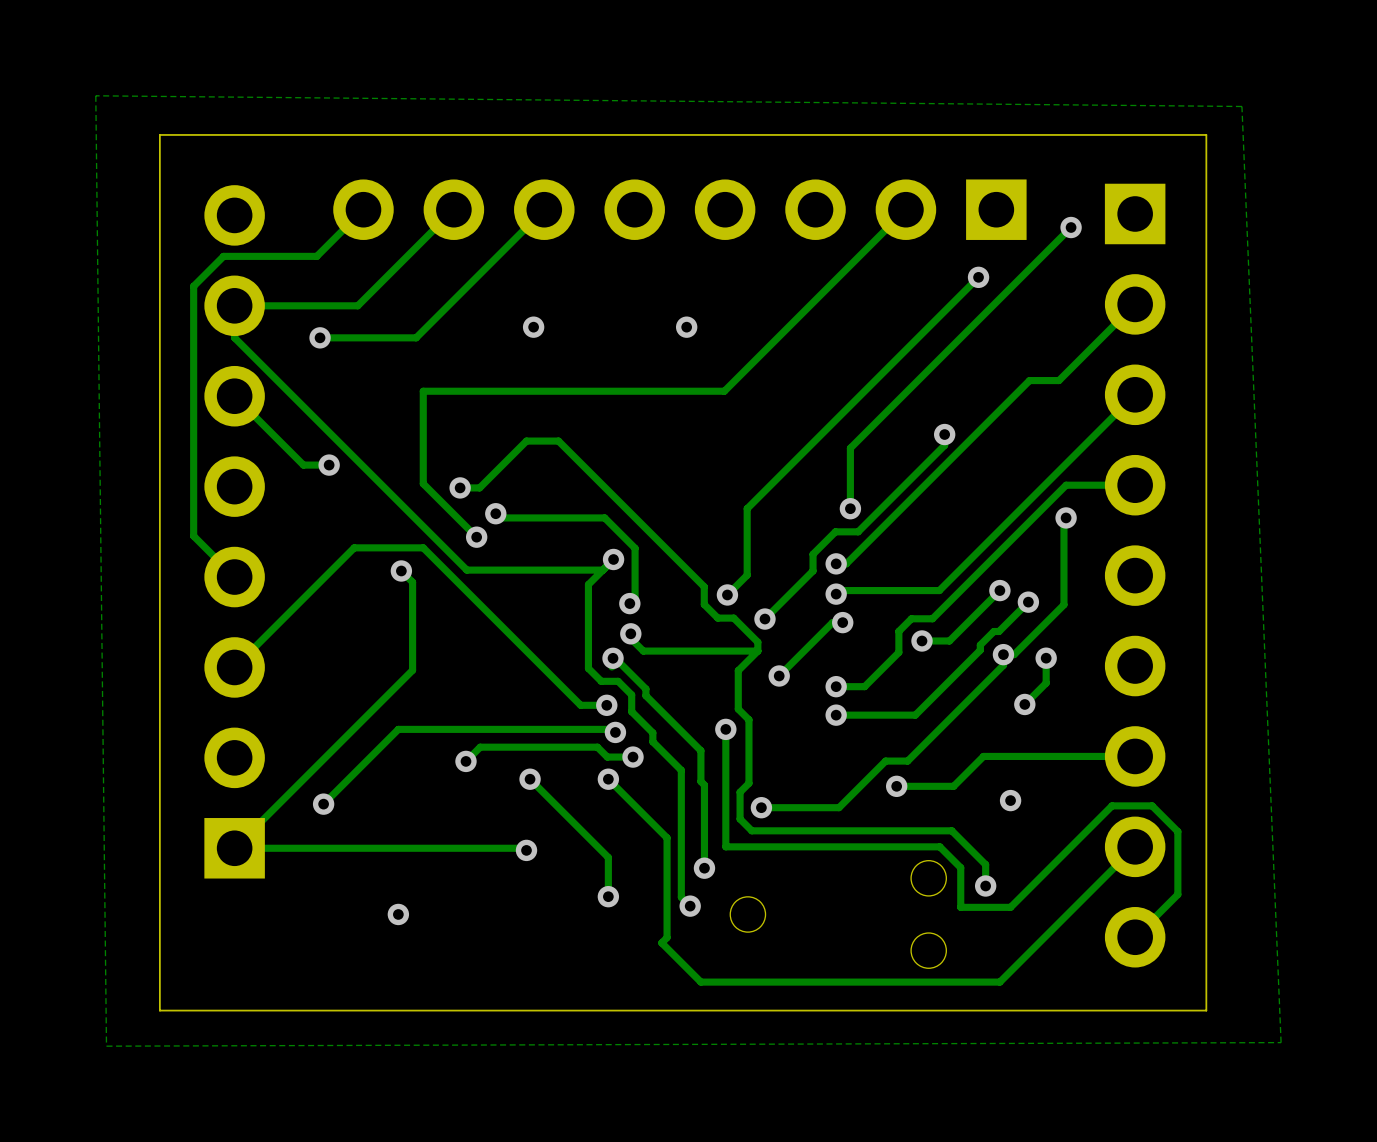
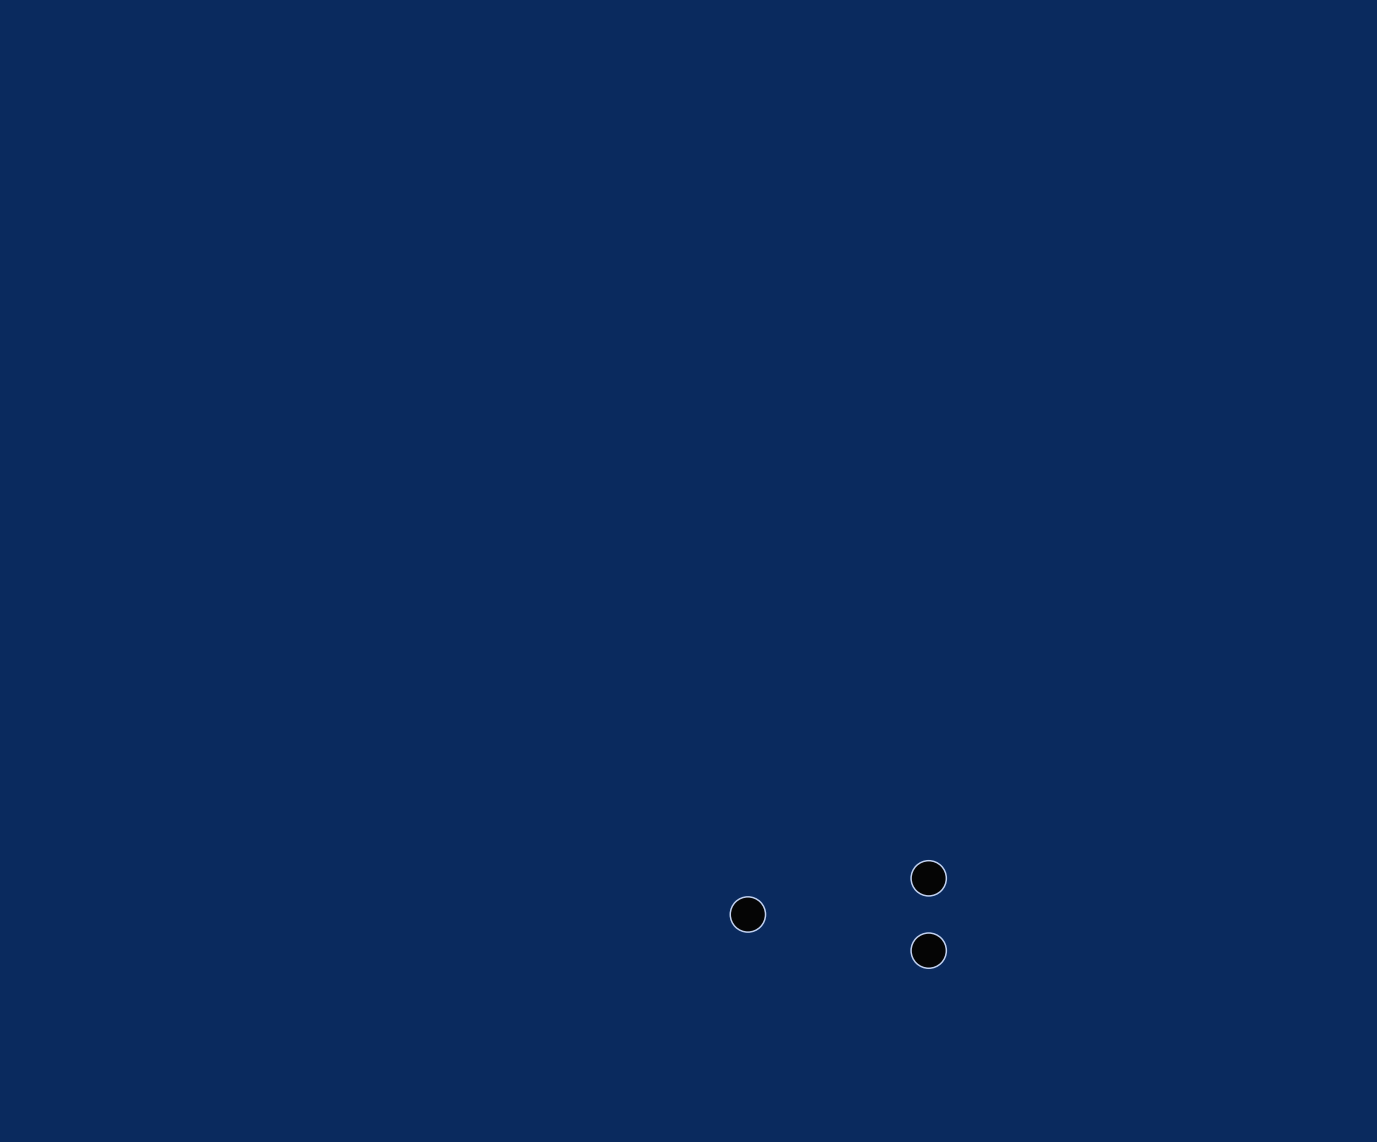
zone outline: (95, 95) (1241, 106) (1281, 1042) (106, 1046) (95, 95) -> none
board edge: (1206, 134) (159, 134) (159, 1010) (1206, 1010) (1206, 134) -> none
track: (363, 209) (316, 256) (223, 256) (193, 286) (193, 536) (234, 577) -> none
track: (453, 209) (357, 305) (234, 305) (234, 337) (466, 570) (602, 570) -> none
track: (544, 209) (416, 337) (320, 337) -> none
part: (679, 209) -> none
track: (905, 209) (724, 391) (423, 391) (423, 483) (476, 537) -> none
track: (1071, 227) (850, 448) (850, 508) -> none
via: (1071, 227) -> none
track: (978, 277) (747, 508) (747, 575) (727, 594) -> none
via: (978, 277) -> none
track: (1135, 304) (1058, 380) (1029, 380) (846, 563) (836, 563) -> none
via: (533, 327) -> none
via: (686, 327) -> none
via: (320, 337) -> none
track: (1135, 394) (939, 590) (839, 590) (836, 594) -> none
track: (234, 396) (303, 465) (329, 465) -> none
track: (944, 434) (944, 445) (858, 531) (835, 531) (813, 554) (813, 570) (764, 619) -> none
via: (944, 434) -> none
via: (329, 465) -> none
track: (1135, 485) (1066, 485) (932, 618) (911, 618) (898, 631) (898, 652) (864, 686) (836, 686) -> none
track: (460, 487) (479, 487) (526, 441) (558, 441) (704, 586) (704, 604) (717, 618) (733, 618) (757, 642) (757, 651) -> none
via: (460, 487) -> none
via: (850, 508) -> none
track: (495, 513) (500, 517) (604, 517) (635, 548) (635, 598) (629, 603) -> none
via: (495, 513) -> none
track: (1066, 517) (1063, 520) (1063, 604) (1014, 654) (1003, 654) (1003, 665) (907, 761) (885, 761) (839, 807) (761, 807) -> none
via: (1066, 517) -> none
part: (234, 531) -> none
via: (476, 537) -> none
track: (613, 559) (588, 584) (588, 668) (601, 681) (618, 681) (631, 694) (631, 711) (652, 732) (652, 741) (681, 770) (681, 897) (690, 906) -> none
via: (613, 559) -> none
via: (836, 563) -> none
track: (401, 570) (412, 582) (412, 670) (234, 848) (524, 848) (526, 850) -> none
via: (401, 570) -> none
part: (1135, 575) -> none
track: (999, 590) (949, 640) (922, 640) -> none
via: (999, 590) -> none
via: (727, 594) -> none
via: (836, 594) -> none
track: (1028, 602) (999, 631) (993, 631) (980, 645) (980, 650) (915, 715) (836, 715) -> none
via: (1028, 602) -> none
via: (629, 603) -> none
via: (764, 619) -> none
track: (842, 622) (832, 622) (779, 675) -> none
via: (842, 622) -> none
track: (630, 633) (630, 638) (643, 651) (757, 651) -> none
via: (630, 633) -> none
via: (922, 640) -> none
track: (757, 651) (738, 670) (738, 709) (748, 719) (748, 783) (740, 792) (740, 819) (751, 830) (951, 830) (985, 864) (985, 886) -> none
via: (1003, 654) -> none
via: (613, 658) -> none
track: (1046, 658) (1046, 683) (1024, 704) -> none
via: (1046, 658) -> none
track: (234, 667) (354, 547) (423, 547) (580, 705) (606, 705) -> none
track: (611, 667) (613, 658) (615, 658) (645, 688) (645, 695) (700, 750) (700, 781) (704, 785) (704, 868) -> none
via: (779, 675) -> none
via: (836, 686) -> none
via: (1024, 704) -> none
via: (606, 705) -> none
via: (836, 715) -> none
track: (725, 729) (725, 846) (939, 846) (960, 867) (960, 907) (1010, 907) (1112, 805) (1152, 805) (1177, 831) (1177, 894) (1135, 937) -> none
via: (725, 729) -> none
track: (615, 732) (612, 729) (398, 729) (323, 804) -> none
via: (615, 732) -> none
track: (1135, 756) (983, 756) (953, 786) (896, 786) -> none
track: (633, 757) (607, 757) (597, 747) (480, 747) (465, 761) -> none
via: (633, 757) -> none
via: (465, 761) -> none
track: (530, 779) (608, 857) (608, 896) -> none
via: (530, 779) -> none
track: (608, 779) (667, 837) (667, 937) (661, 942) (700, 982) (999, 982) (1135, 846) -> none
via: (608, 779) -> none
via: (896, 786) -> none
via: (1010, 800) -> none
via: (323, 804) -> none
via: (761, 807) -> none
via: (526, 850) -> none
via: (704, 868) -> none
via: (985, 886) -> none
via: (608, 896) -> none
via: (690, 906) -> none
via: (398, 914) -> none

